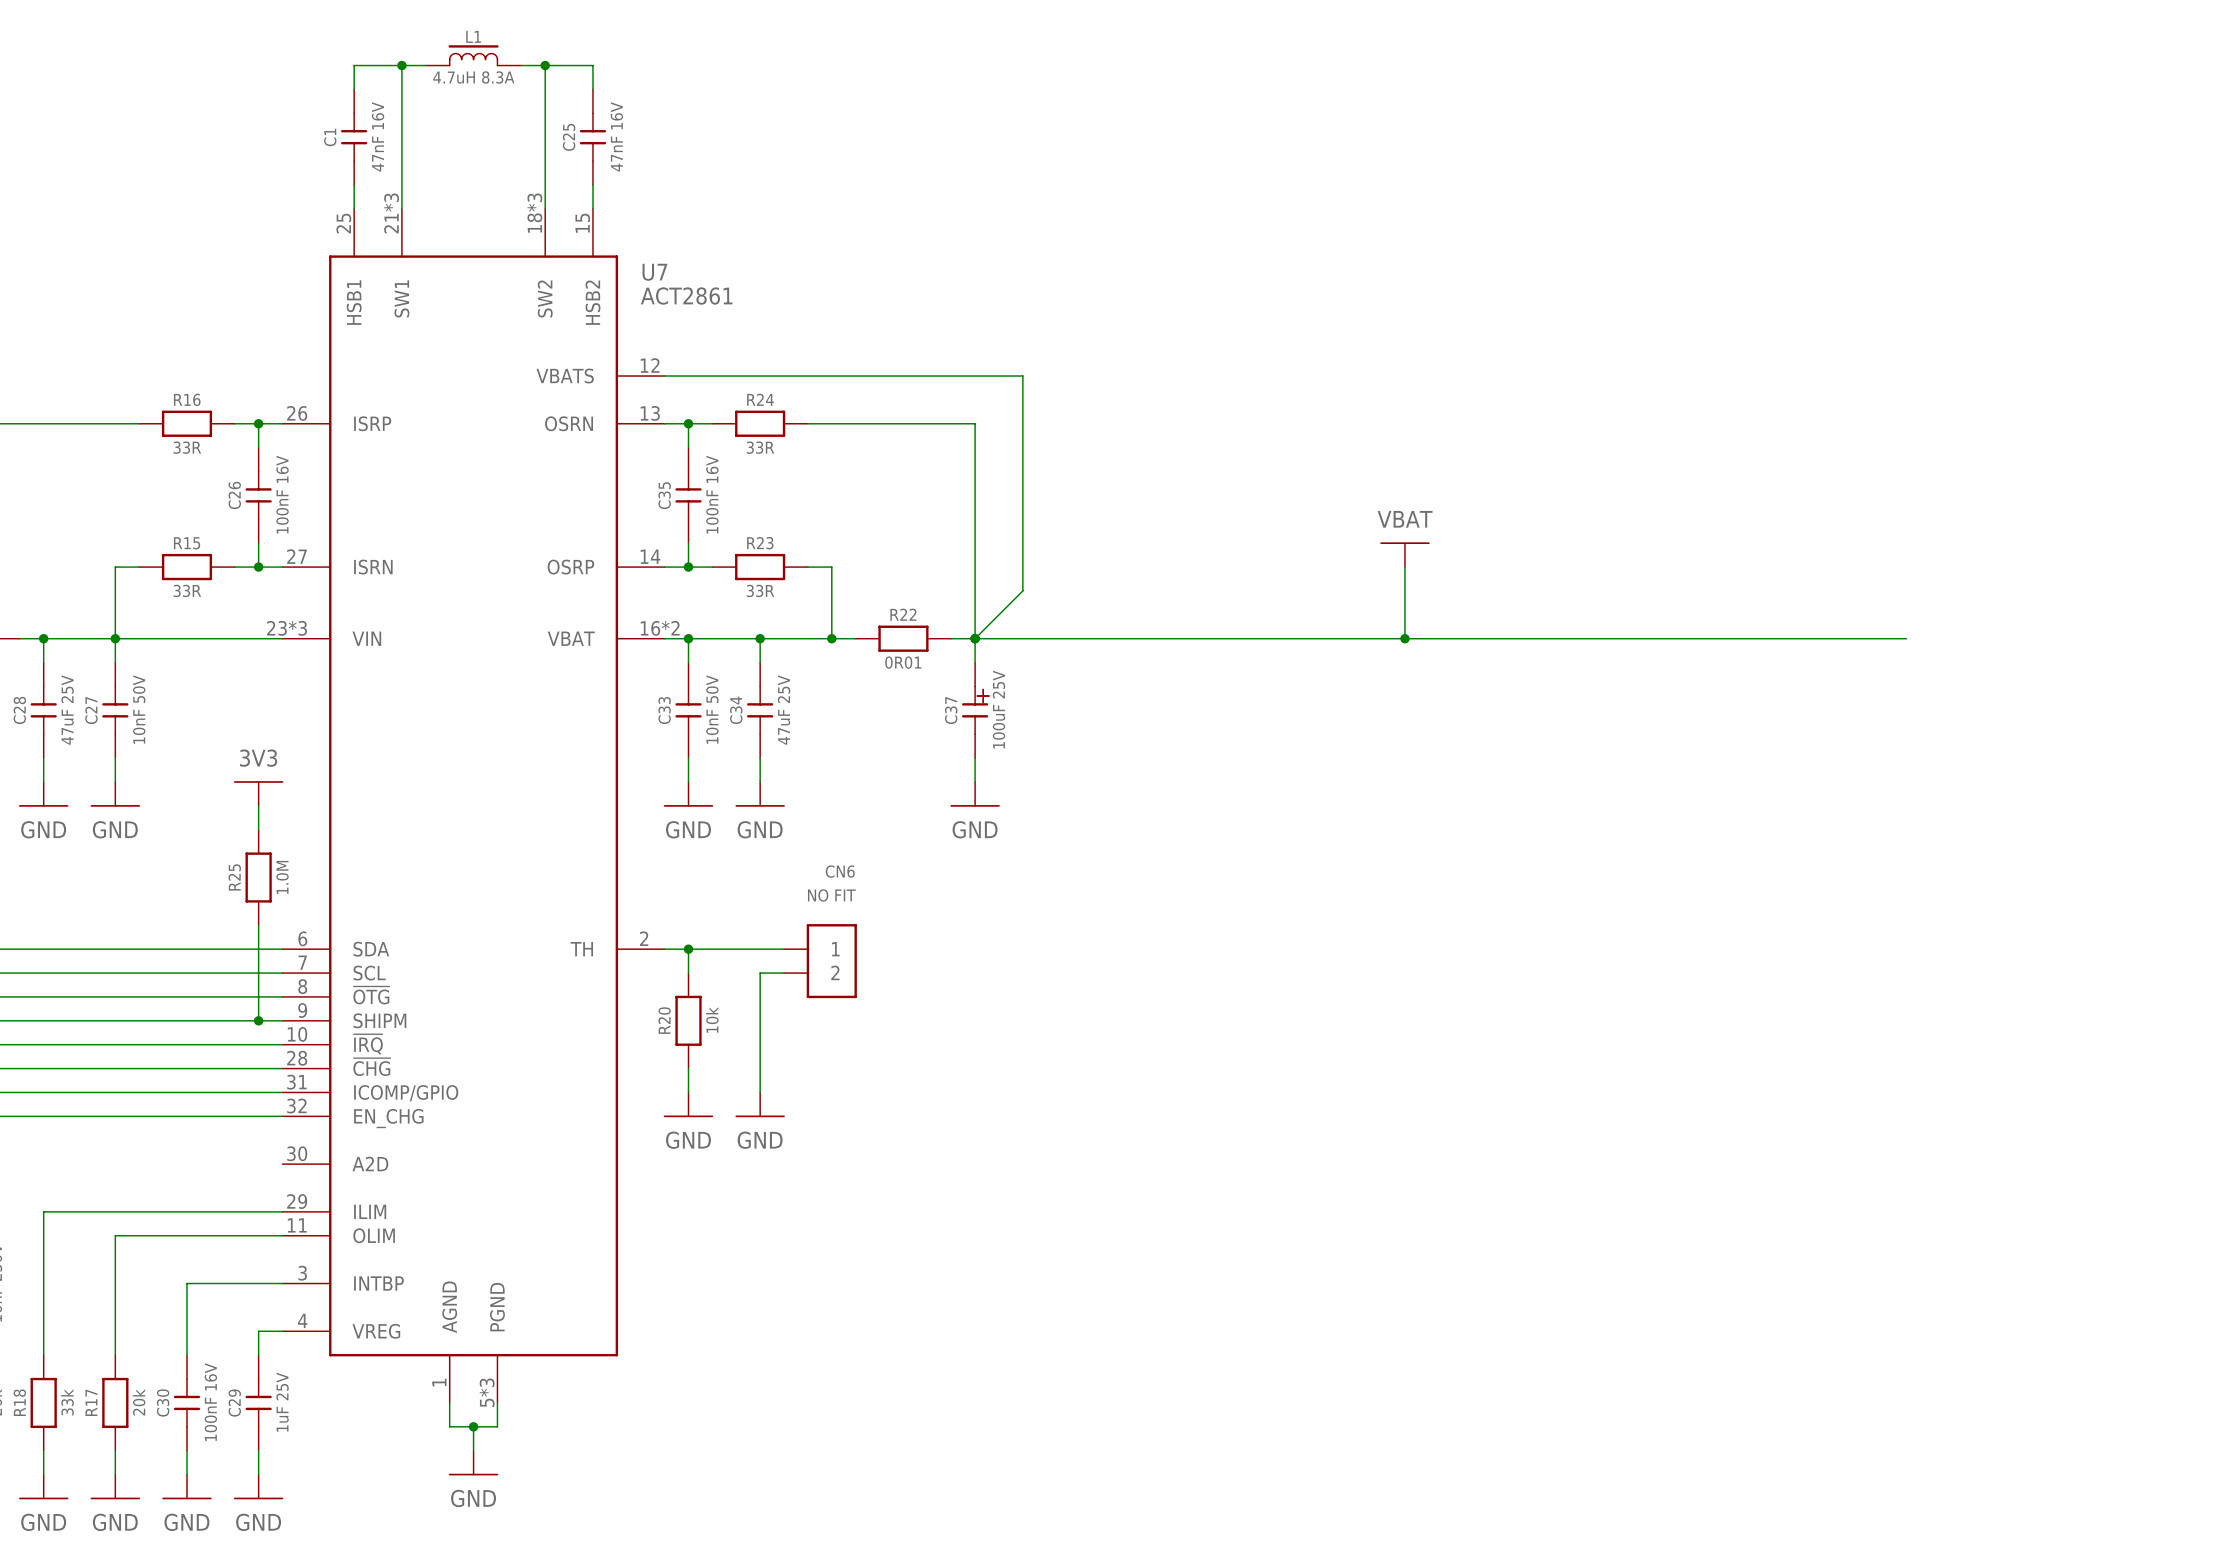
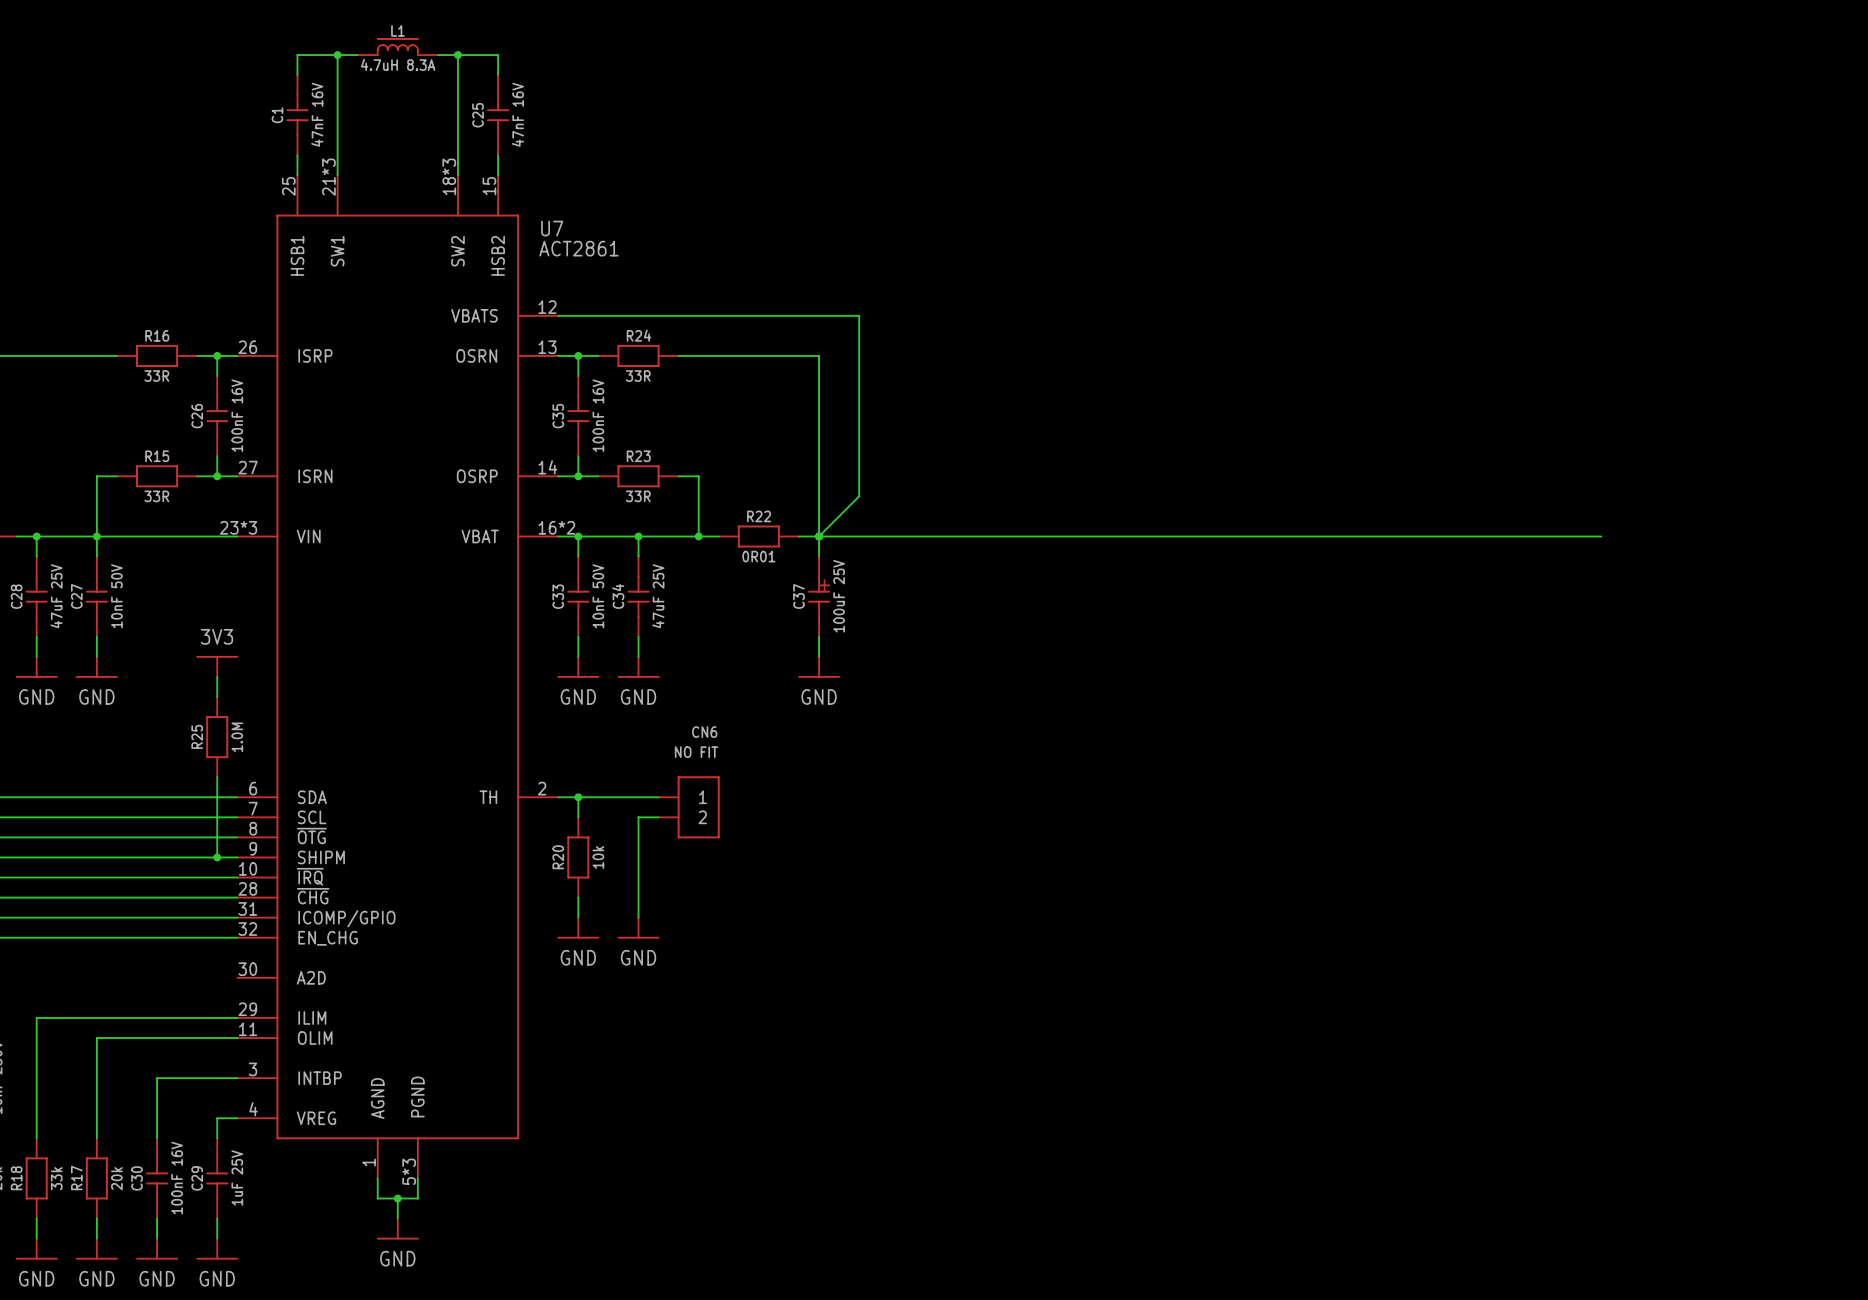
power symbol: VBAT (1404, 554) -> none
wire: (1404, 567) (1404, 638) -> none
junction: (1404, 638) -> none

